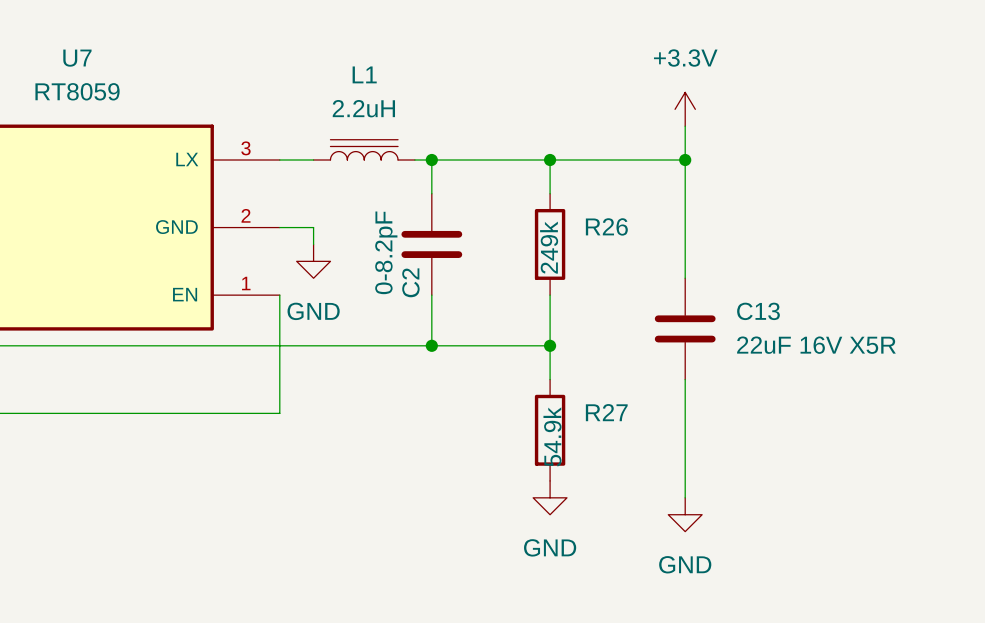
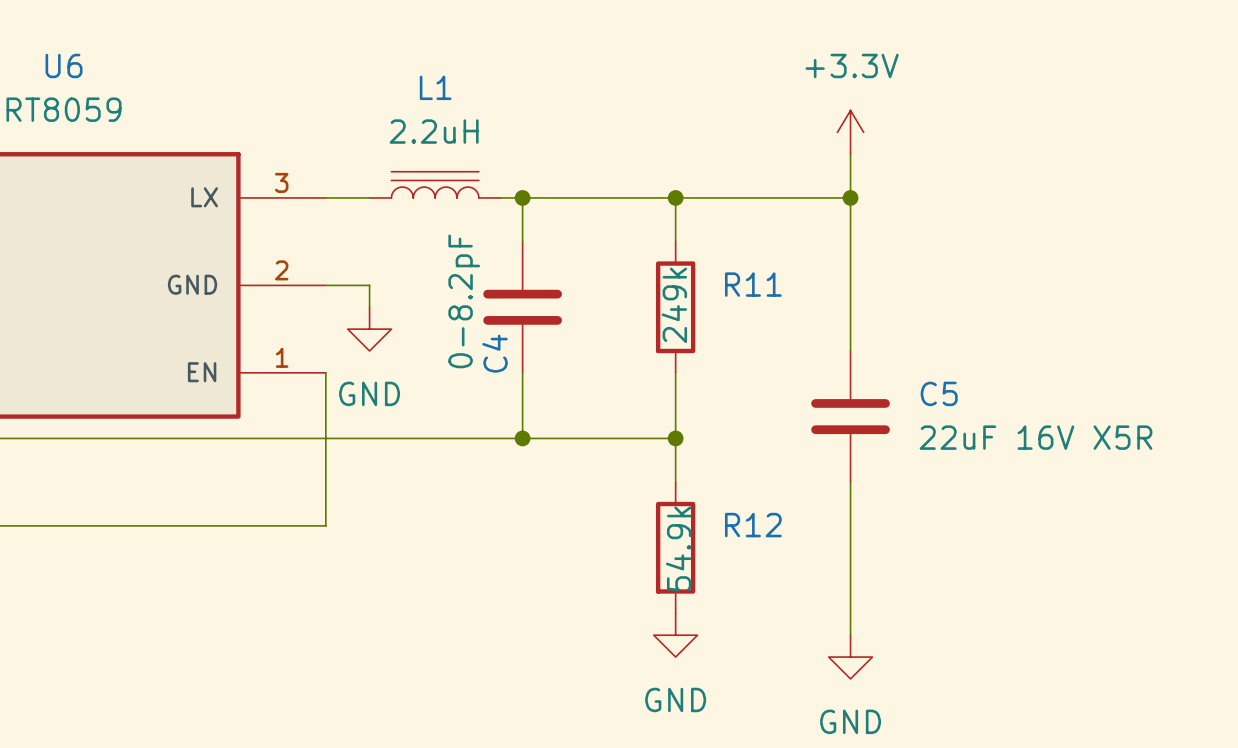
U7 name: U7 (77, 58) -> U6 (64, 65)
R26 name: R26 (606, 226) -> R11 (753, 284)
C2 name: C2 (410, 282) -> C4 (495, 353)
C13 name: C13 (758, 311) -> C5 (939, 393)
R27 name: R27 (606, 412) -> R12 (753, 525)

